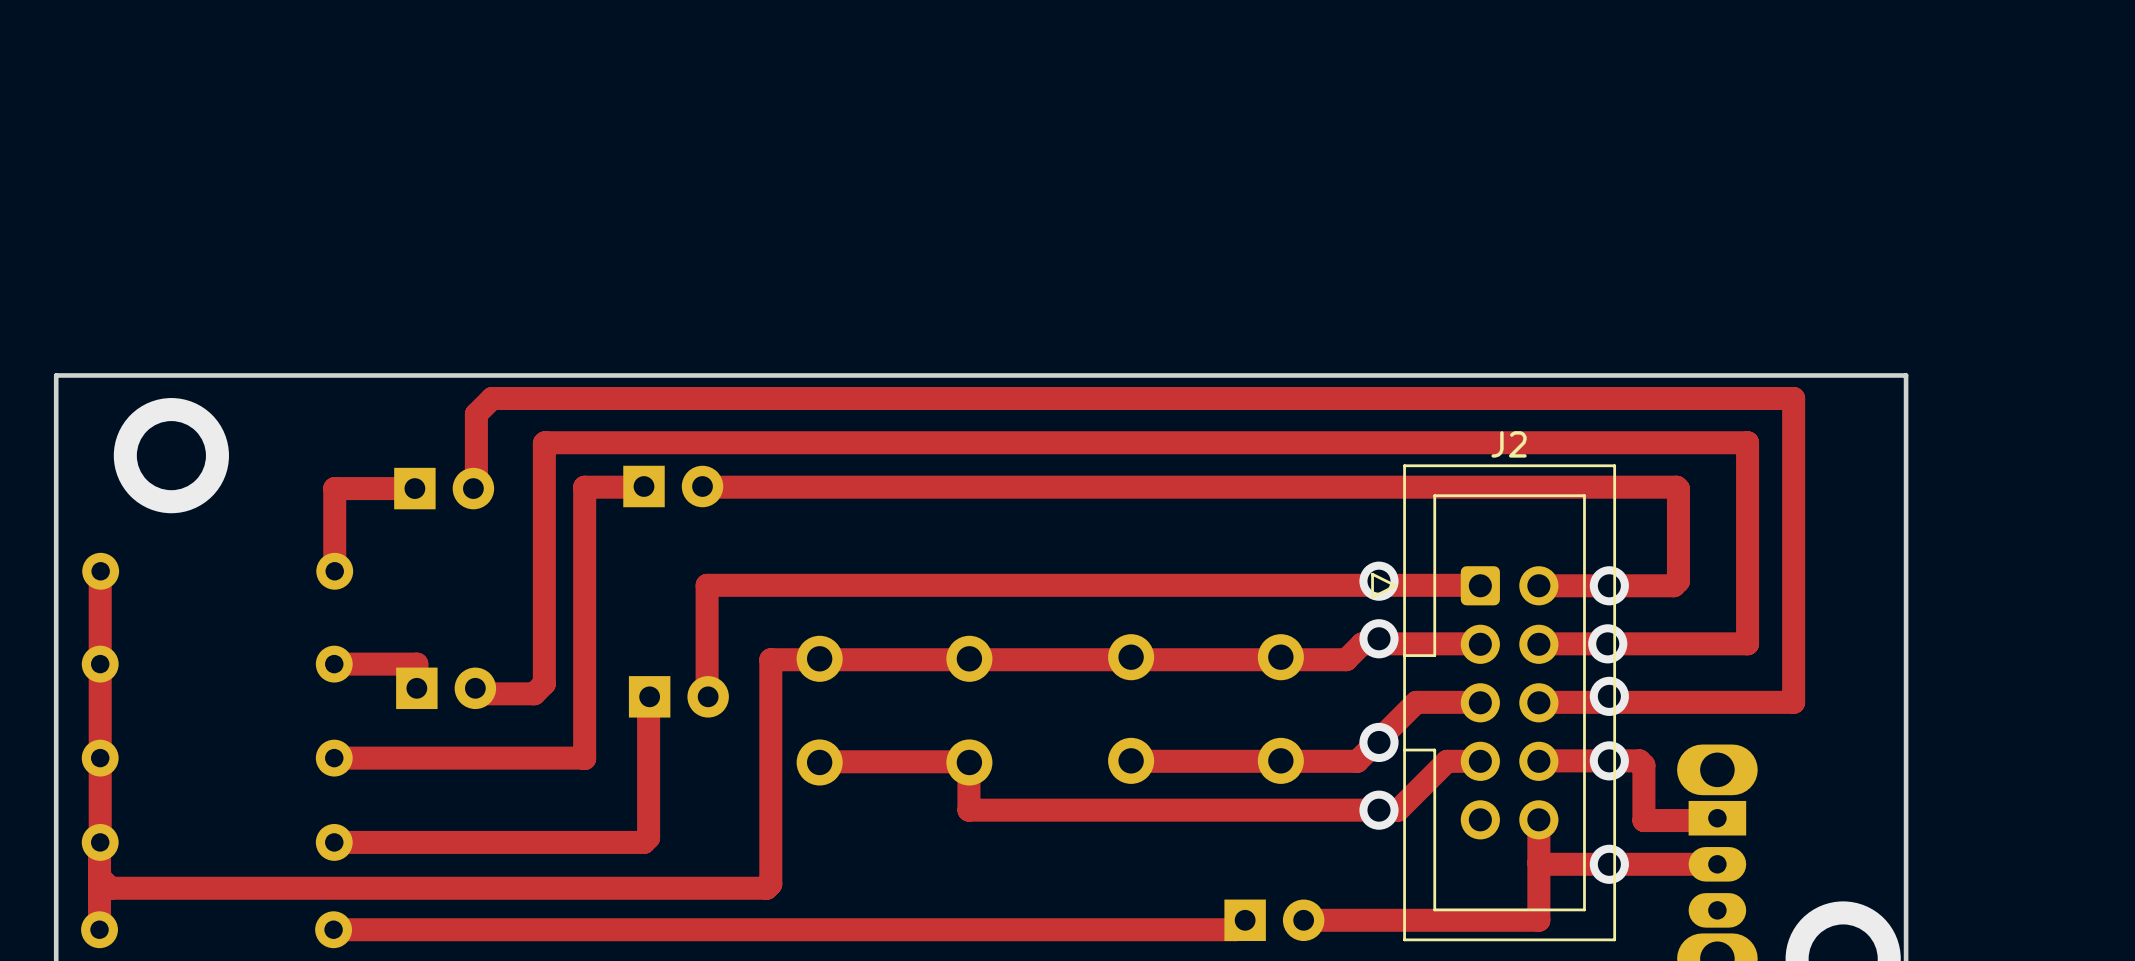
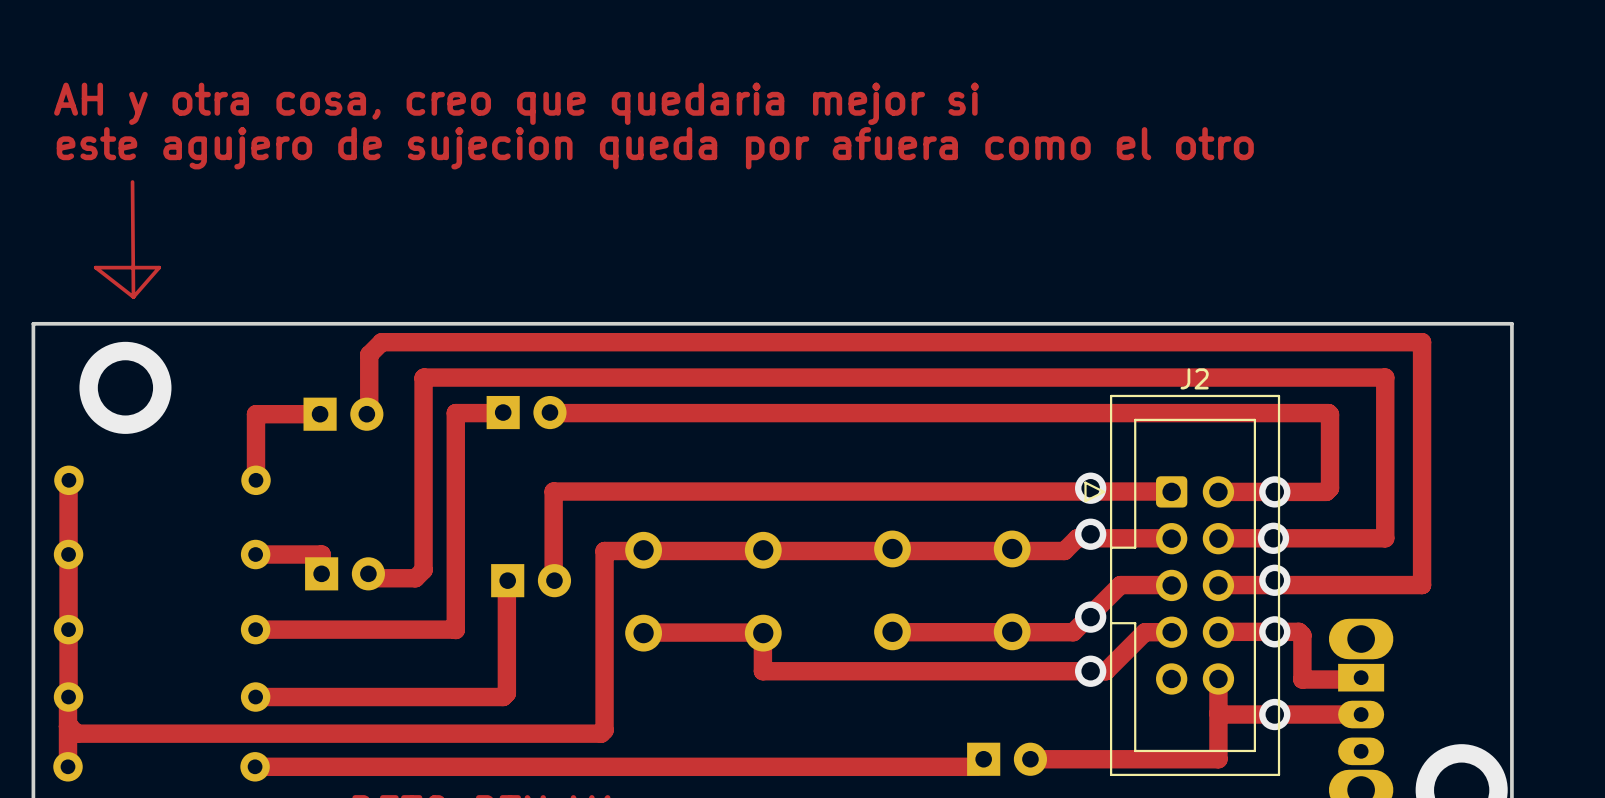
text: none -> AH y otra cosa, creo que quedaria mejor si (516, 103)
text: none -> este agujero de sujecion queda por afuera como el otro (655, 148)
track: none -> (132, 182) (133, 297)
track: none -> (133, 297) (95, 267) (159, 267) (133, 297)

